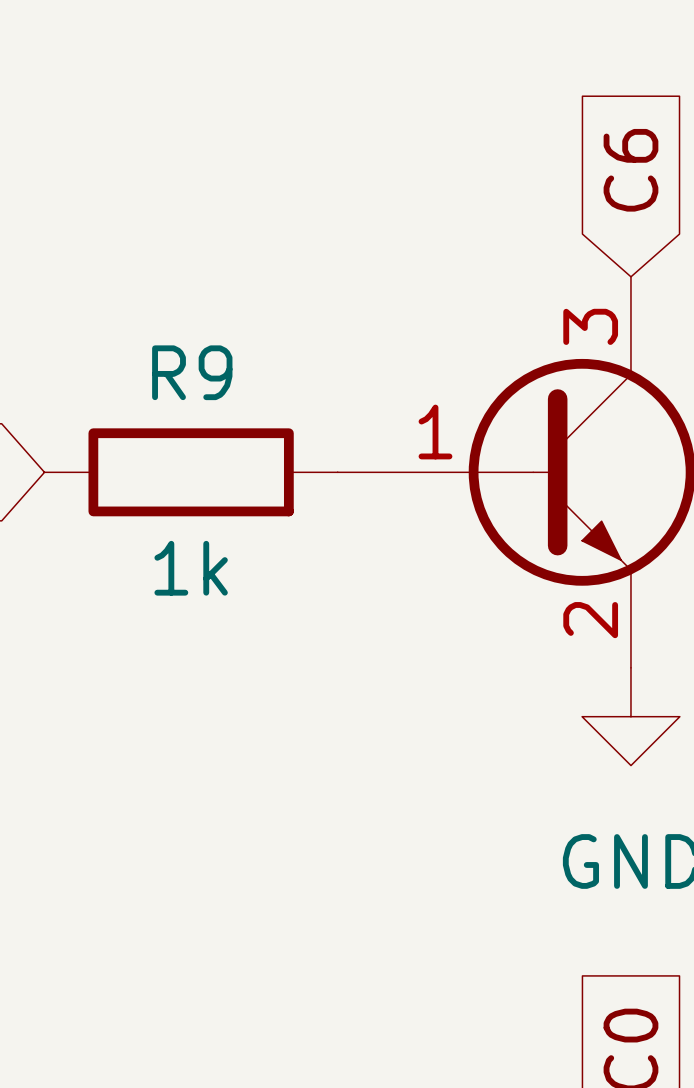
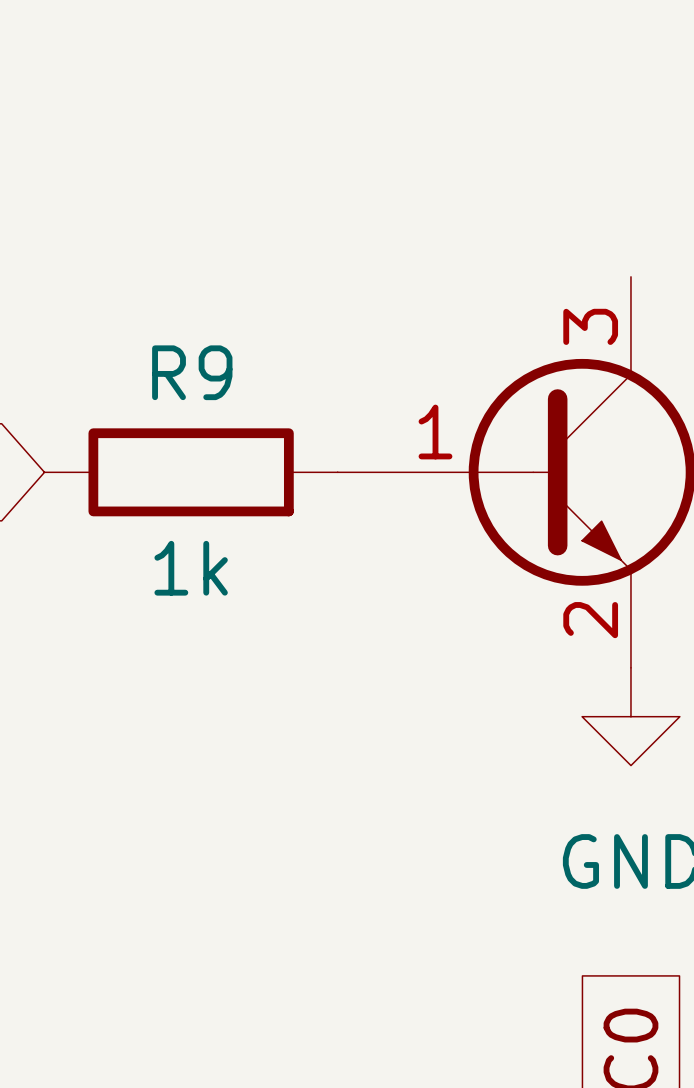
global label: C6 (630, 170) -> none

